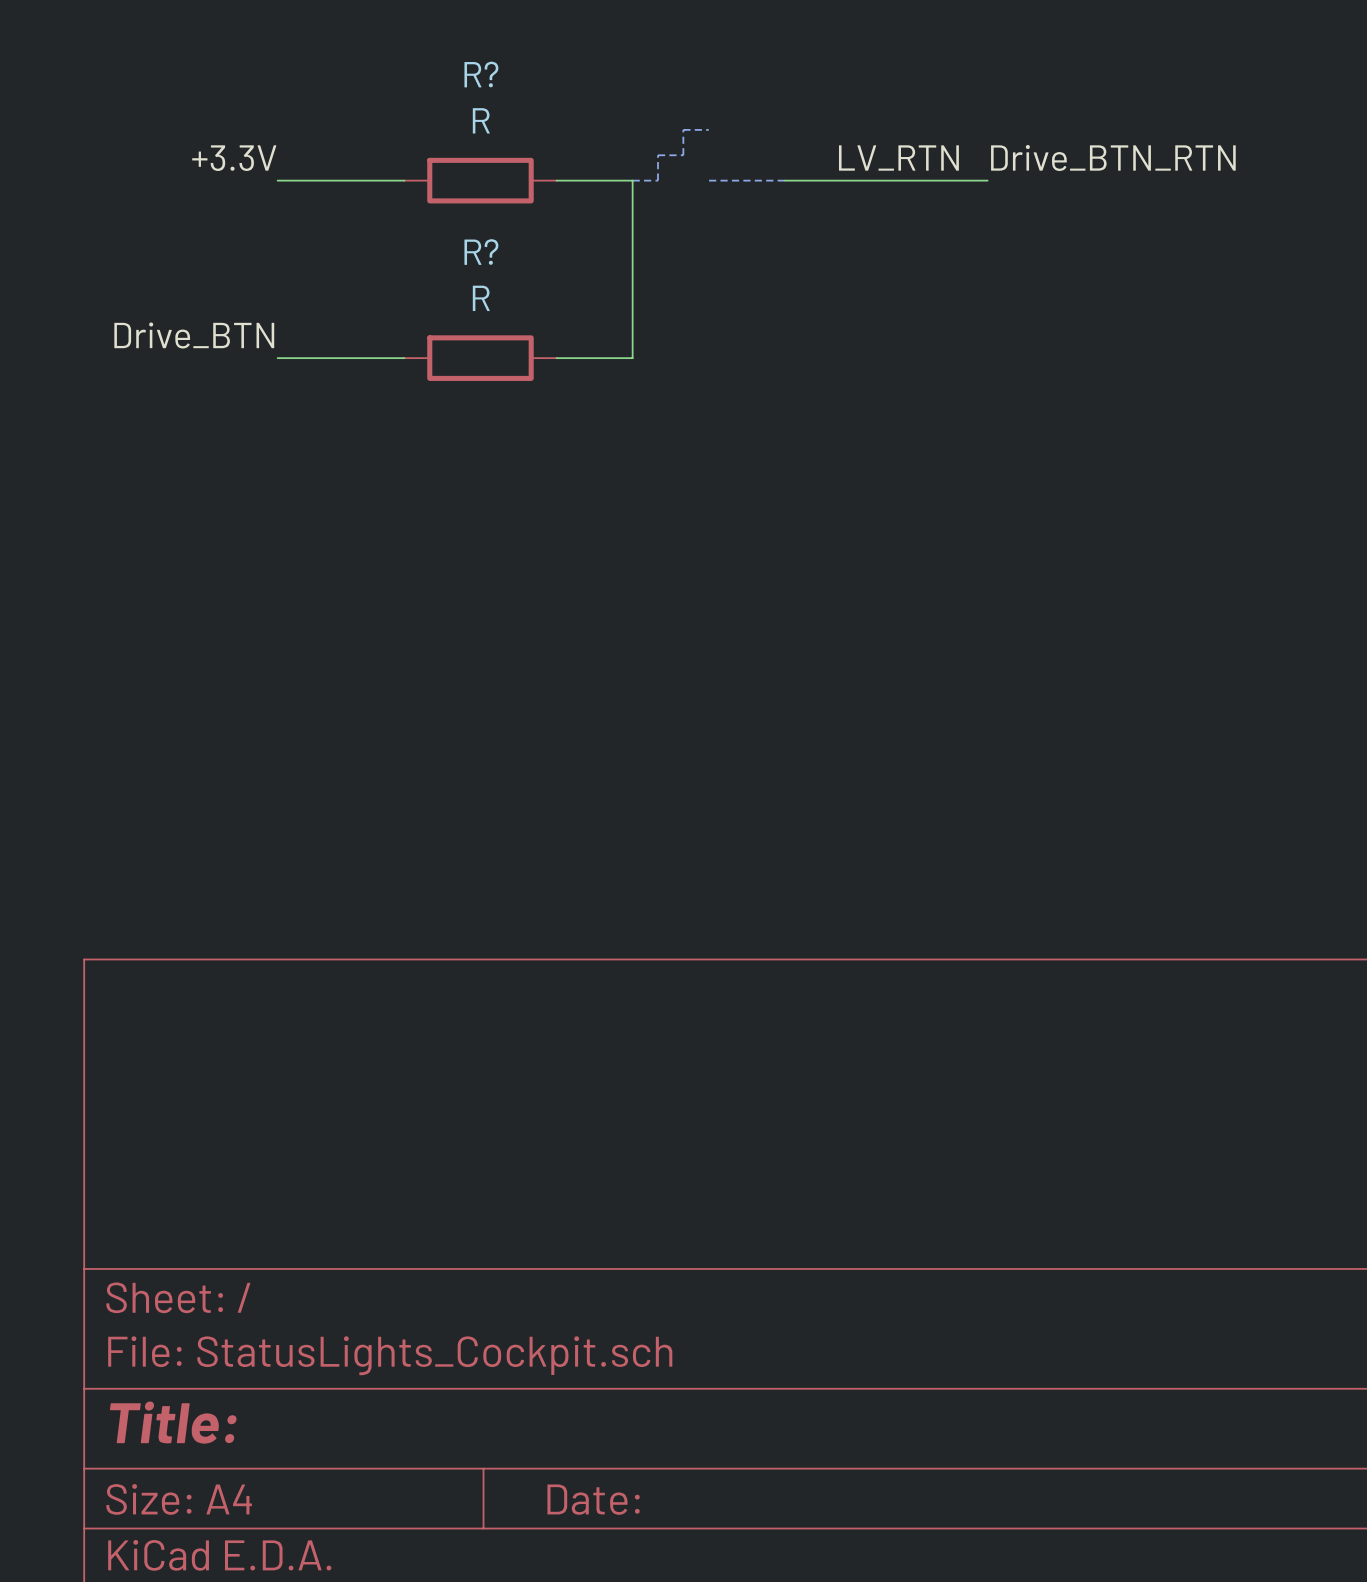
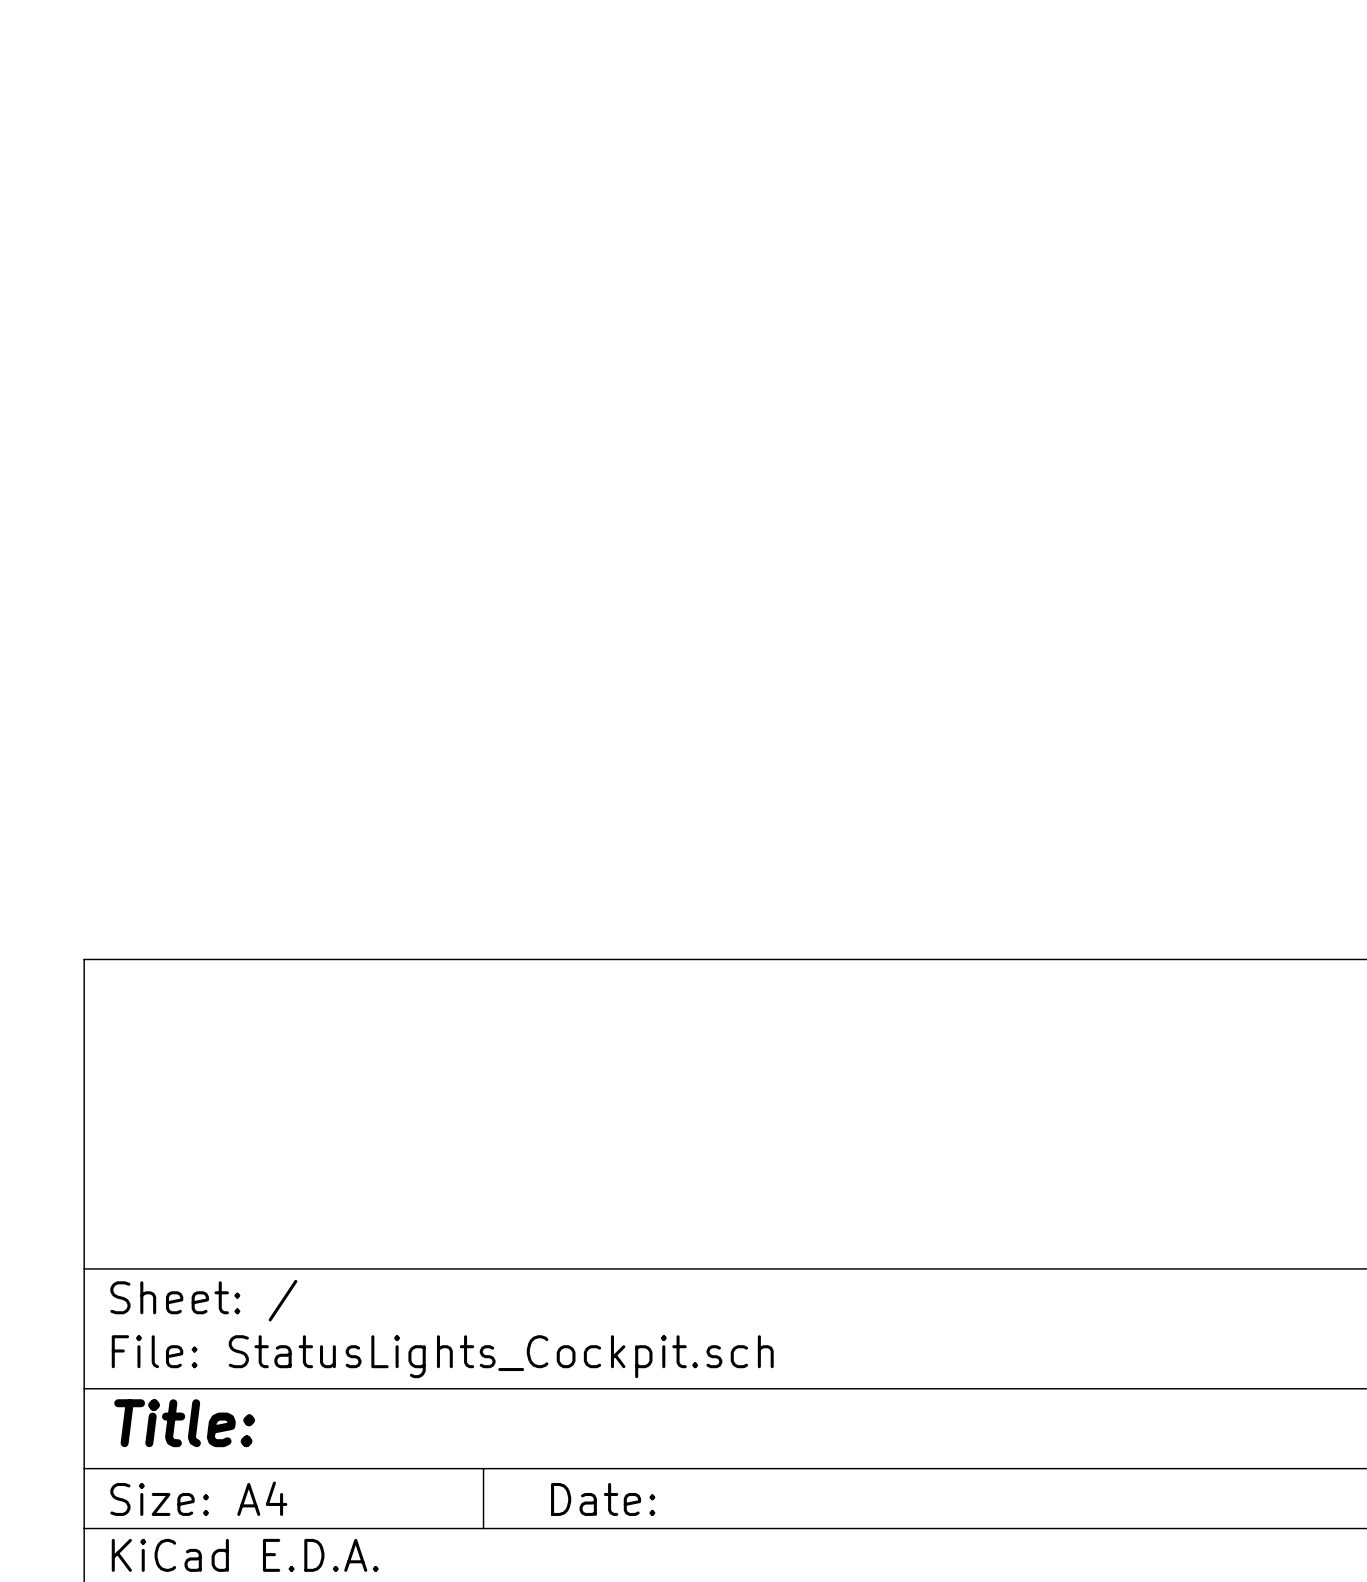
line: (708, 129) (683, 129) (683, 155) (657, 155) (657, 180) (632, 180) -> none
label: Drive_BTN_RTN (1113, 157) -> none
label: +3.3V (234, 158) -> none
label: LV_RTN (898, 158) -> none
wire: (277, 180) (404, 180) -> none
R?: R (480, 180) -> none
wire: (556, 180) (632, 180) (632, 358) (556, 358) -> none
line: (708, 180) (784, 180) -> none
wire: (784, 180) (987, 180) -> none
label: Drive_BTN (194, 335) -> none
wire: (277, 358) (404, 358) -> none
R?: R (480, 358) -> none

